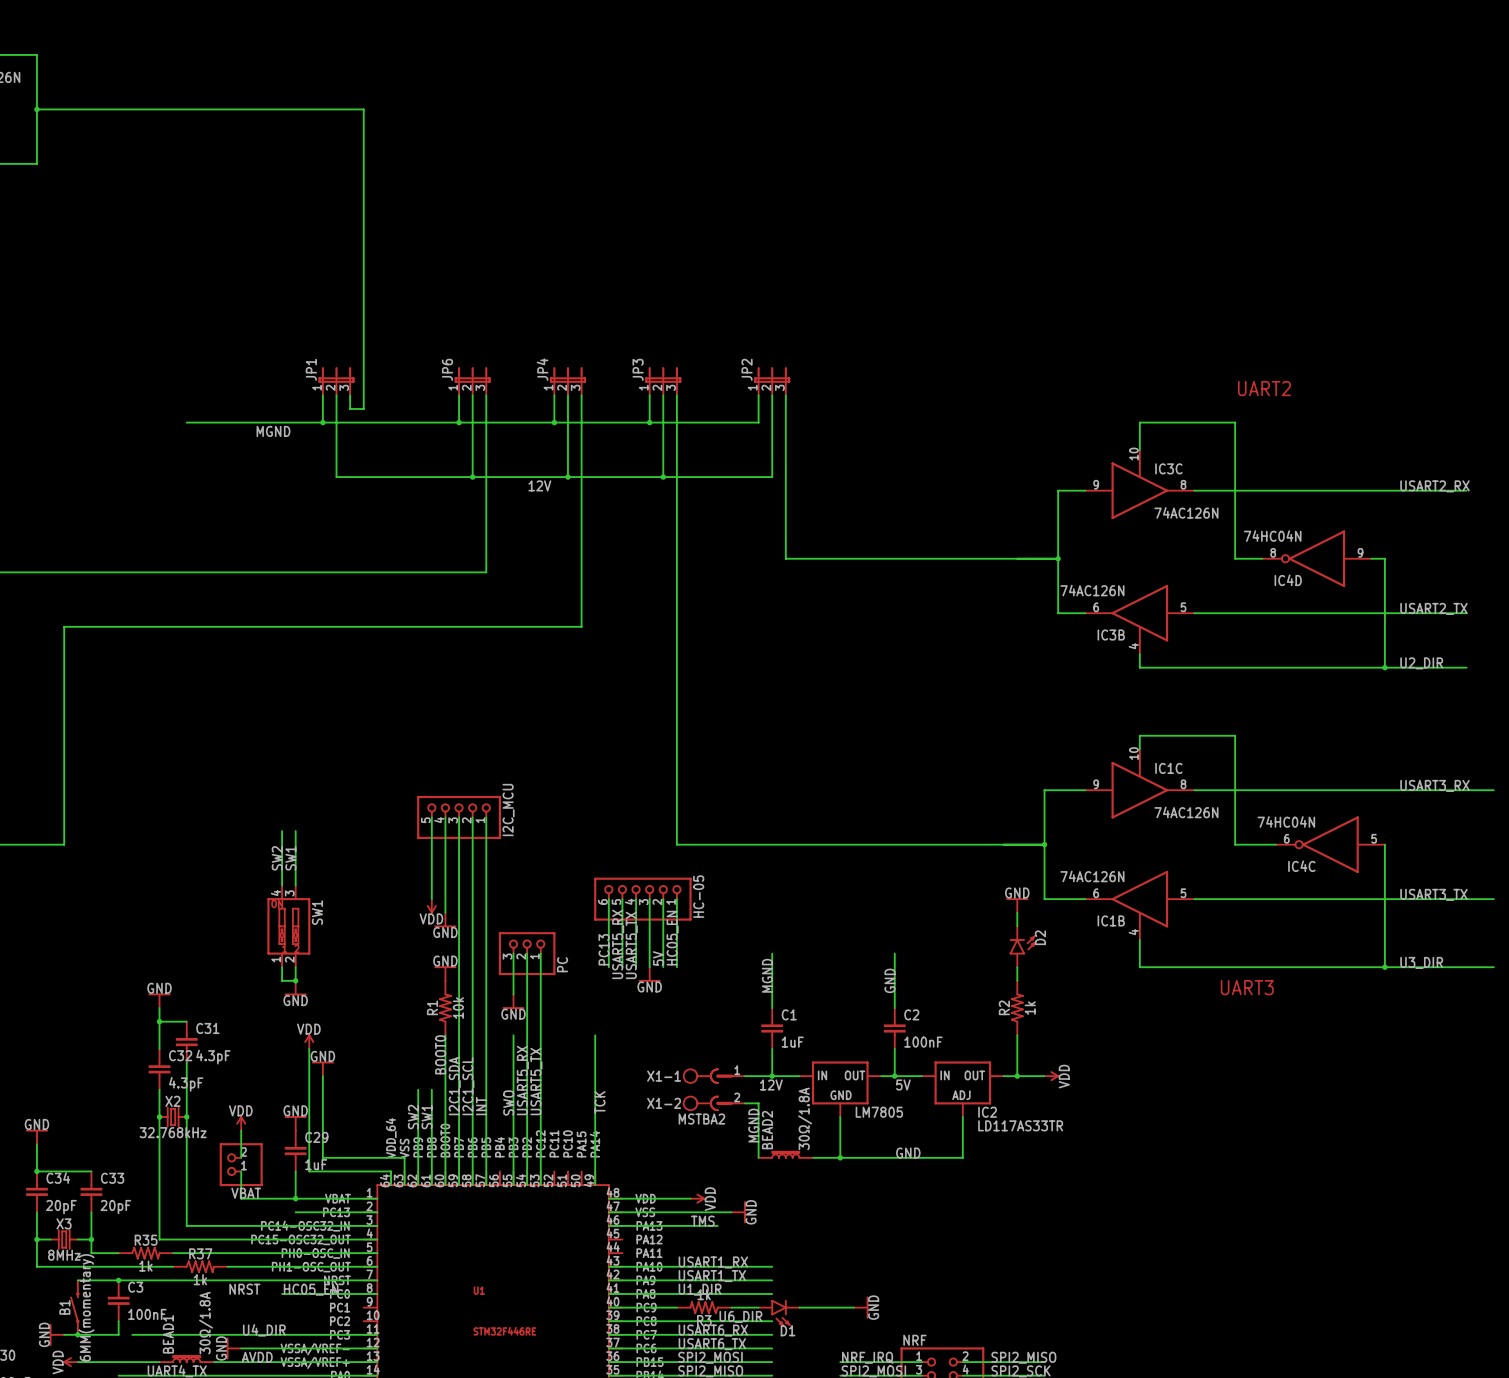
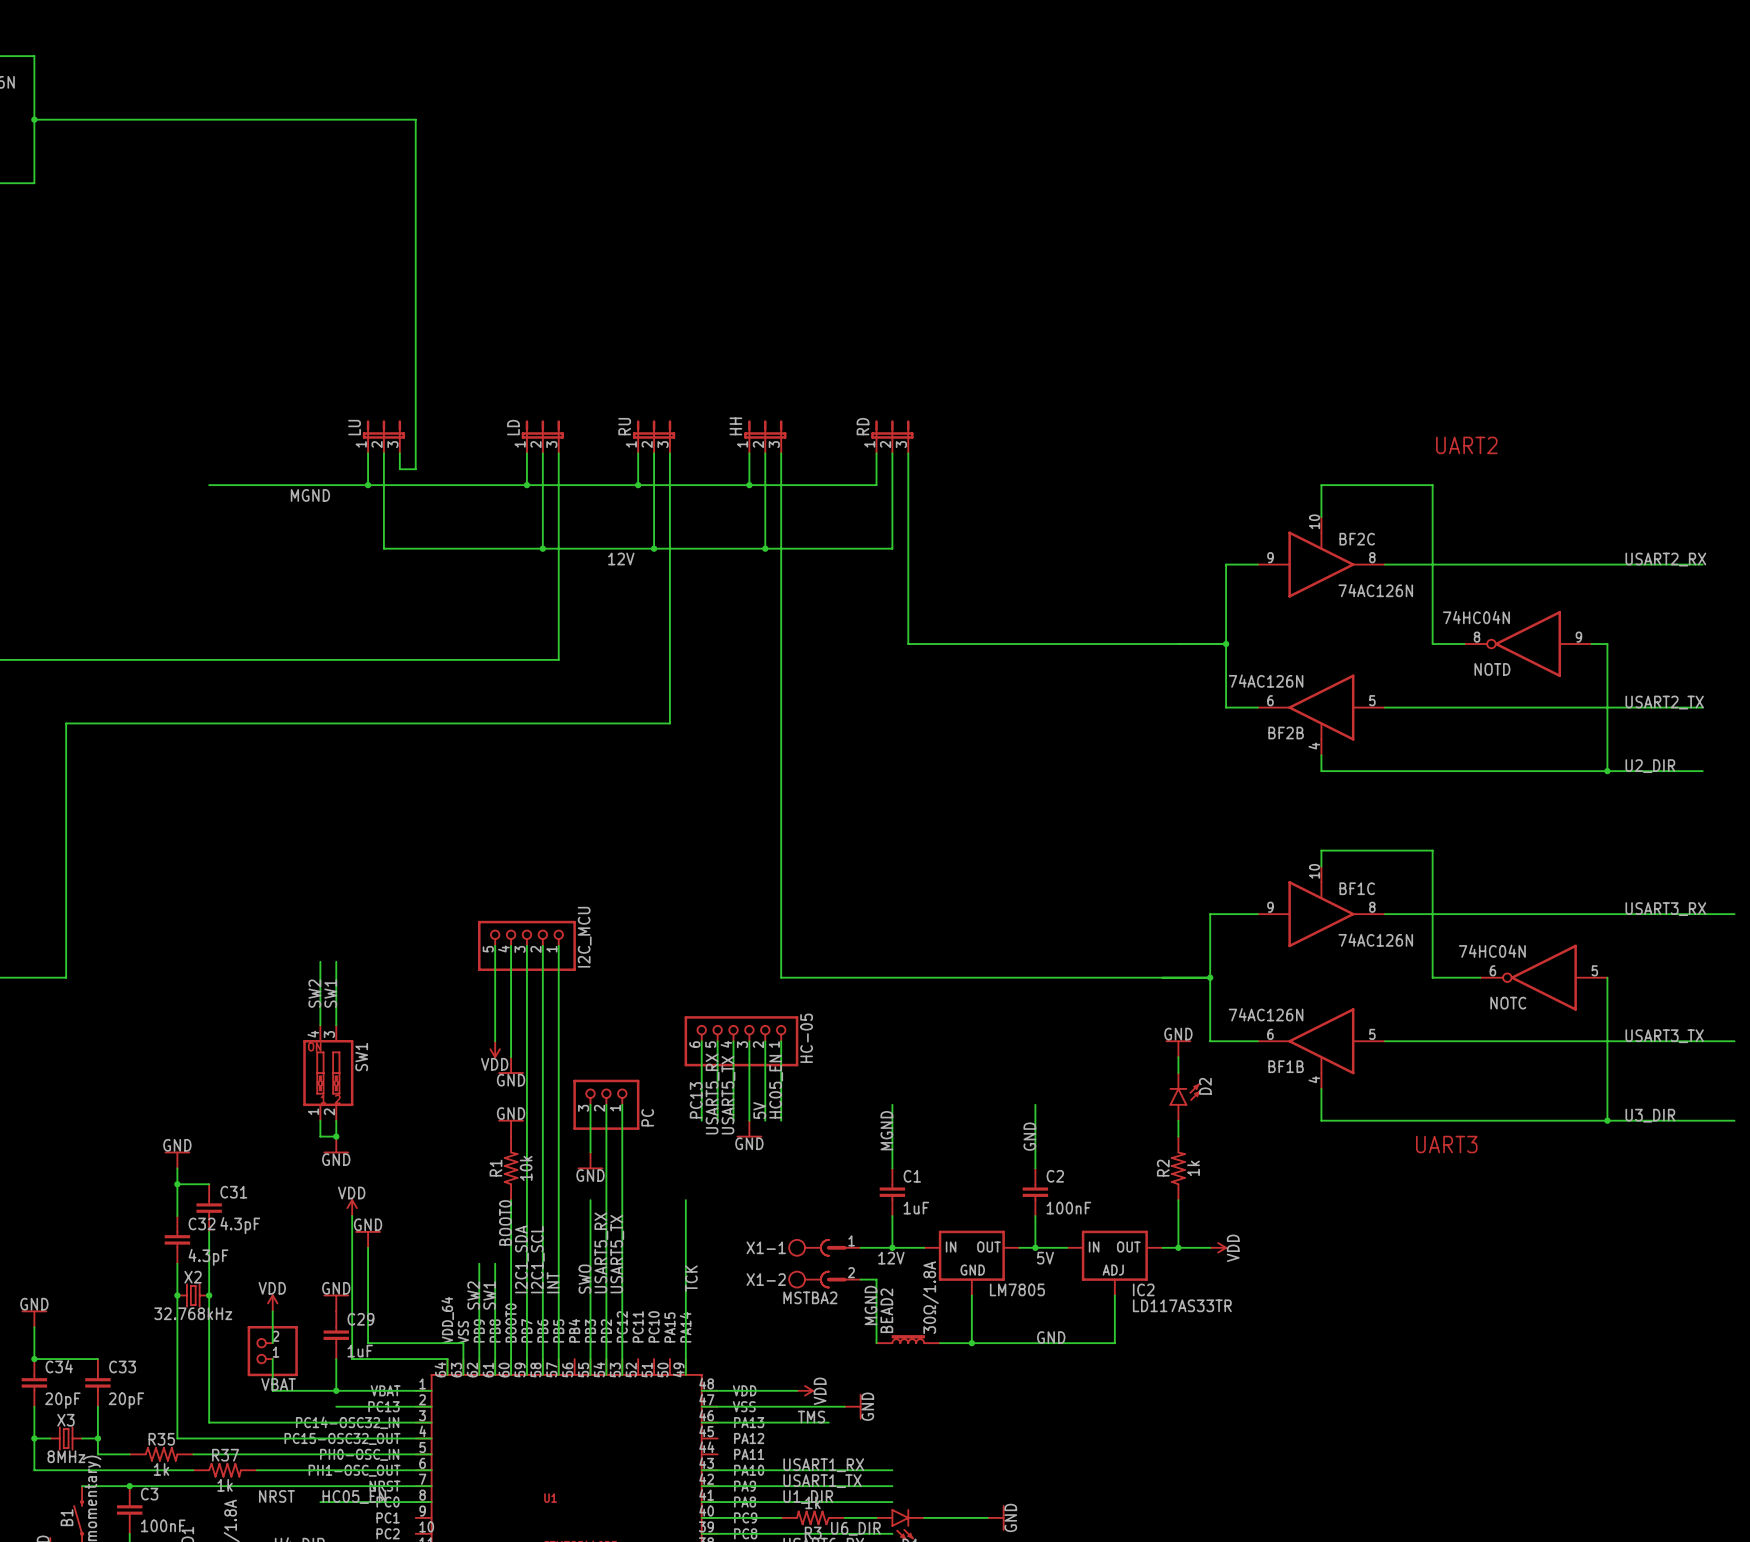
JP1 name: JP1 (311, 369) -> LU (354, 427)
JP6 name: JP6 (447, 369) -> LD (513, 427)
JP4 name: JP4 (542, 369) -> RU (624, 426)
JP3 name: JP3 (638, 369) -> HH (735, 426)
JP2 name: JP2 (747, 369) -> RD (863, 426)
IC3C name: IC3C (1168, 468) -> BF2C (1357, 539)
IC4D name: IC4D (1288, 580) -> NOTD (1492, 669)
IC3B name: IC3B (1111, 634) -> BF2B (1286, 733)
IC1C name: IC1C (1168, 768) -> BF1C (1357, 888)
IC4C name: IC4C (1301, 866) -> NOTC (1508, 1003)
IC1B name: IC1B (1111, 920) -> BF1B (1286, 1066)

